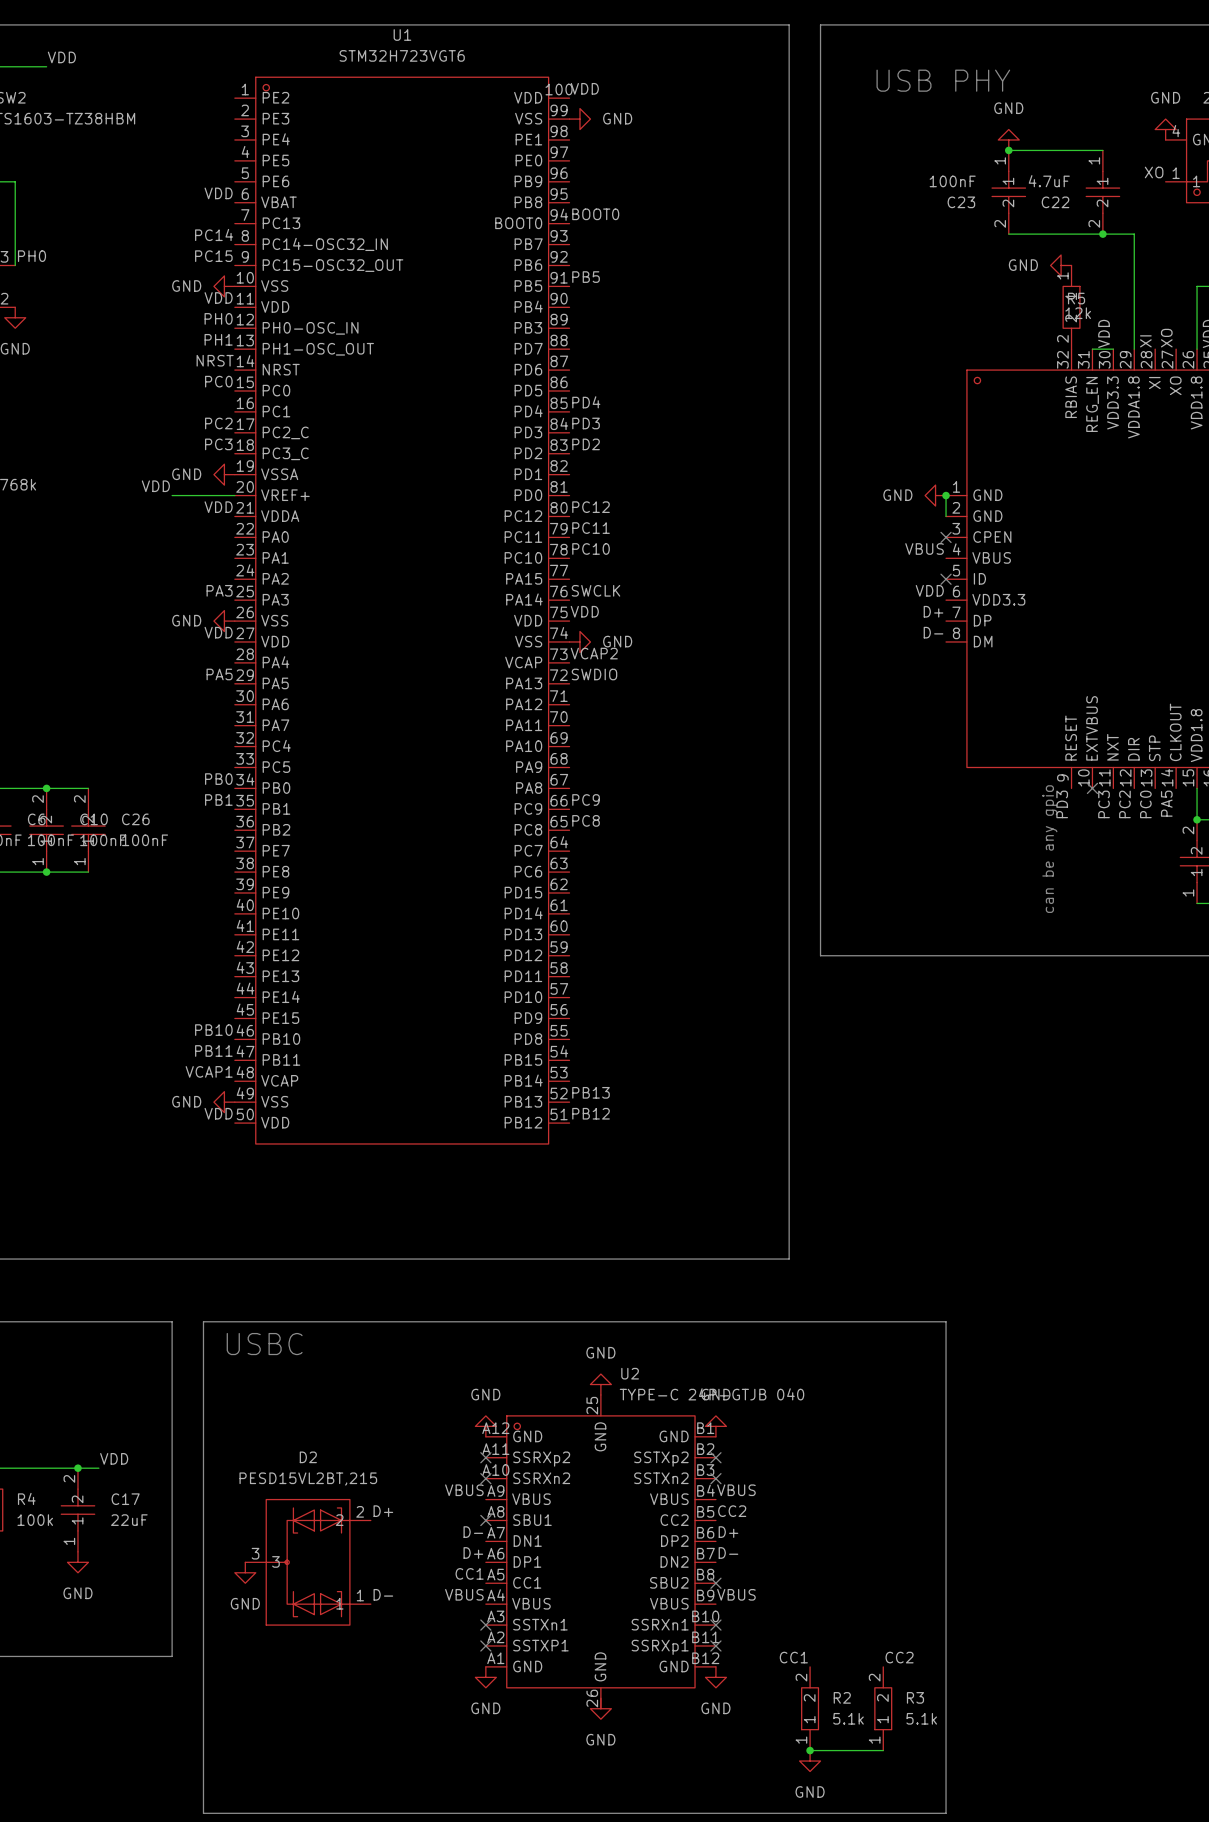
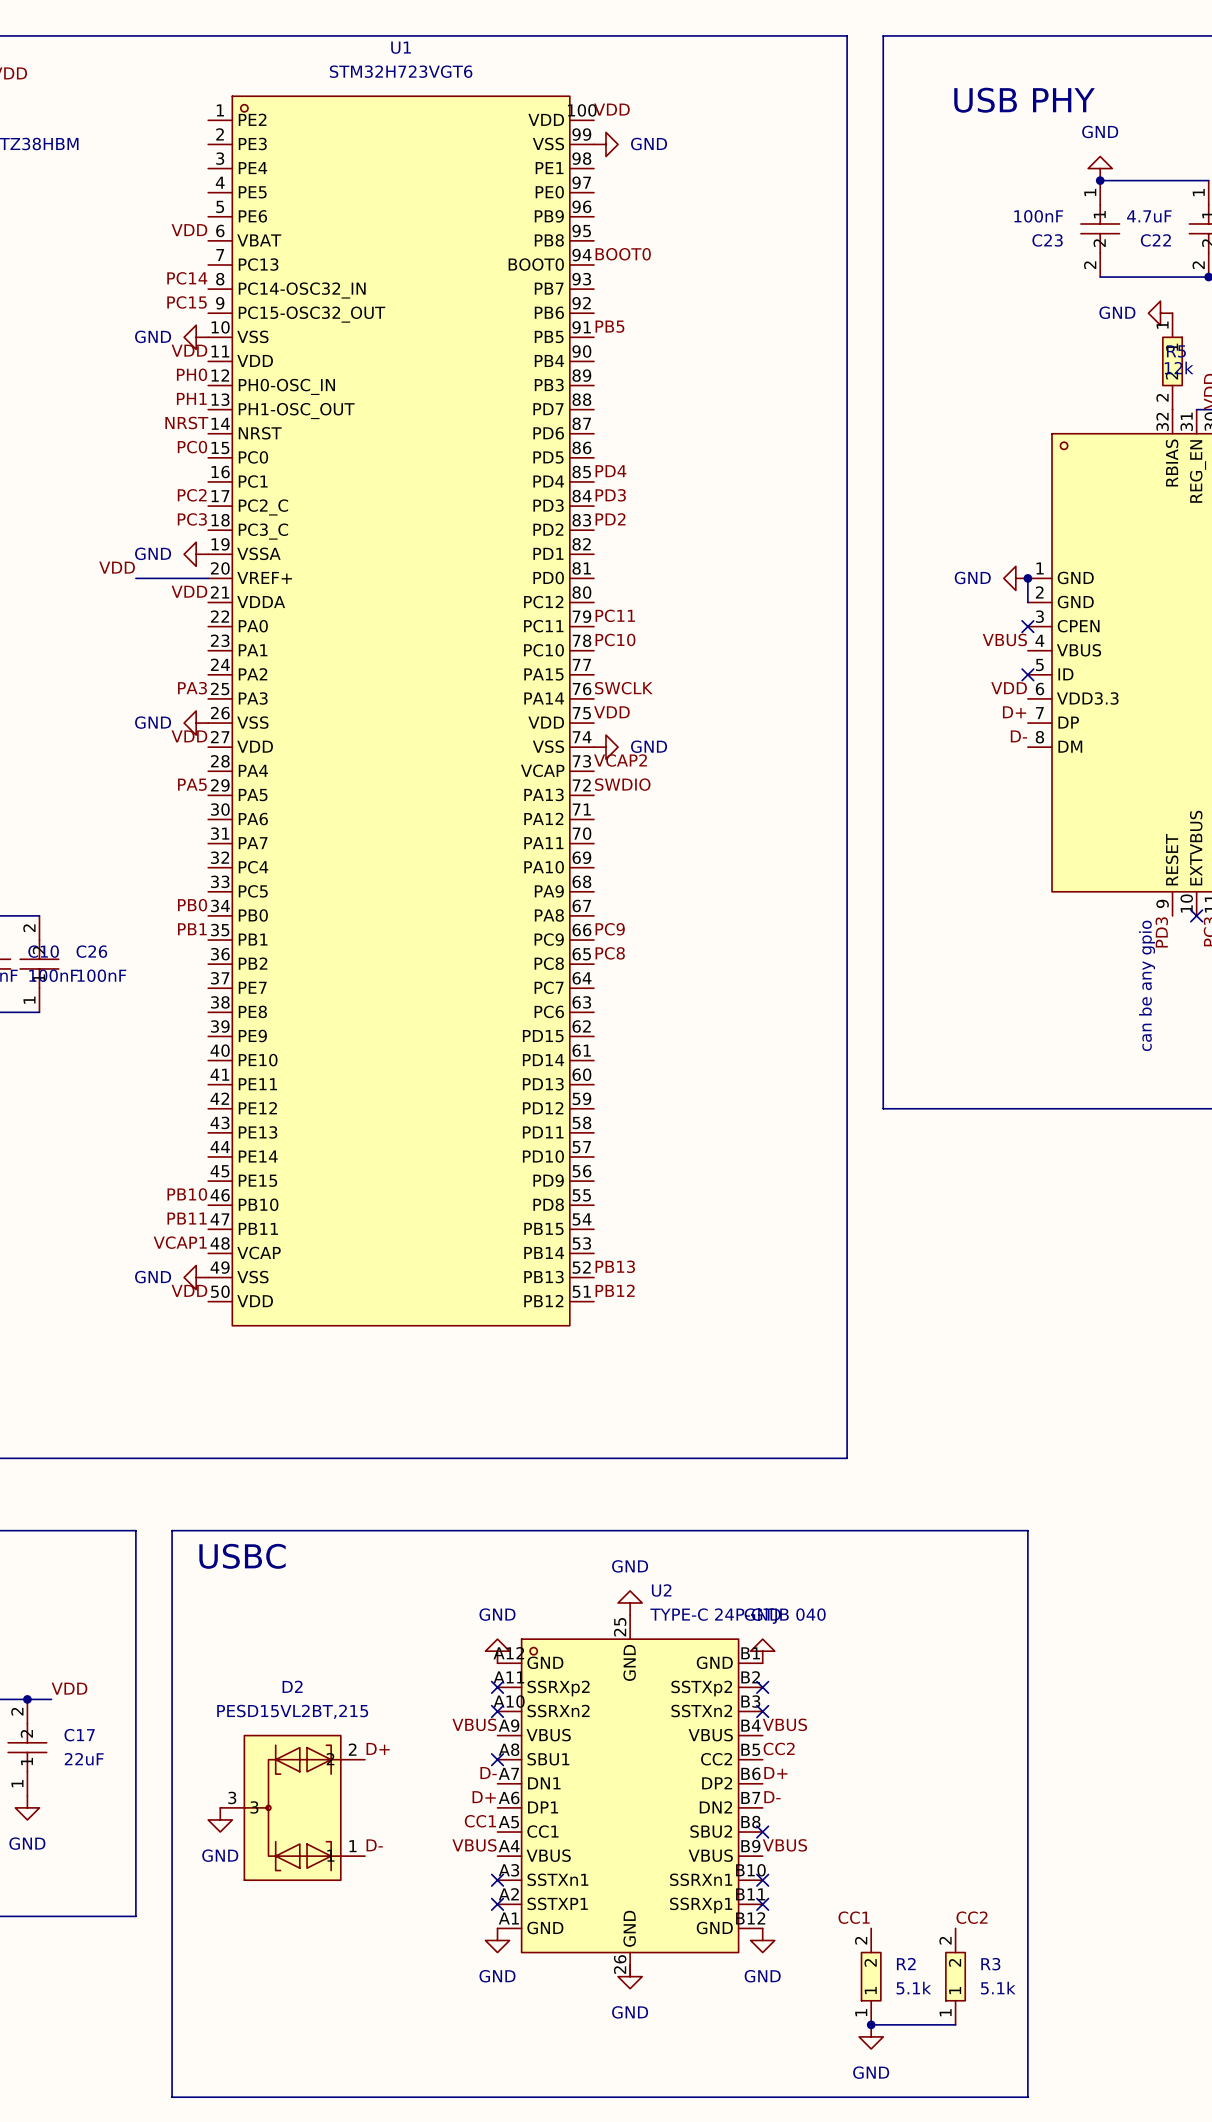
label: PC12 (591, 507) -> none

